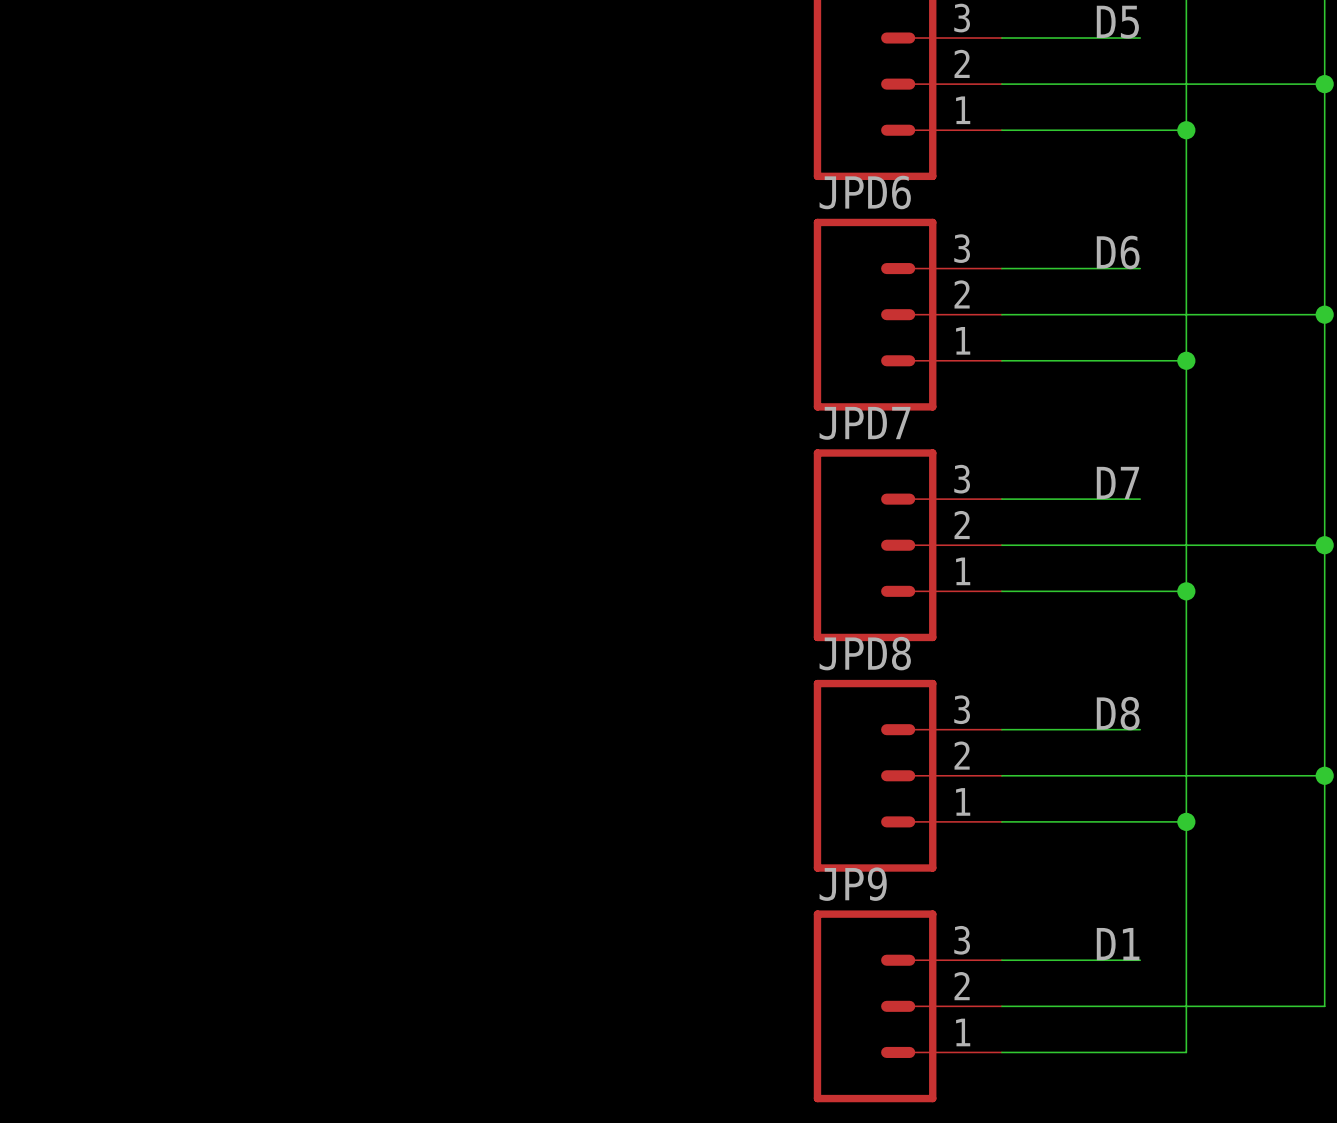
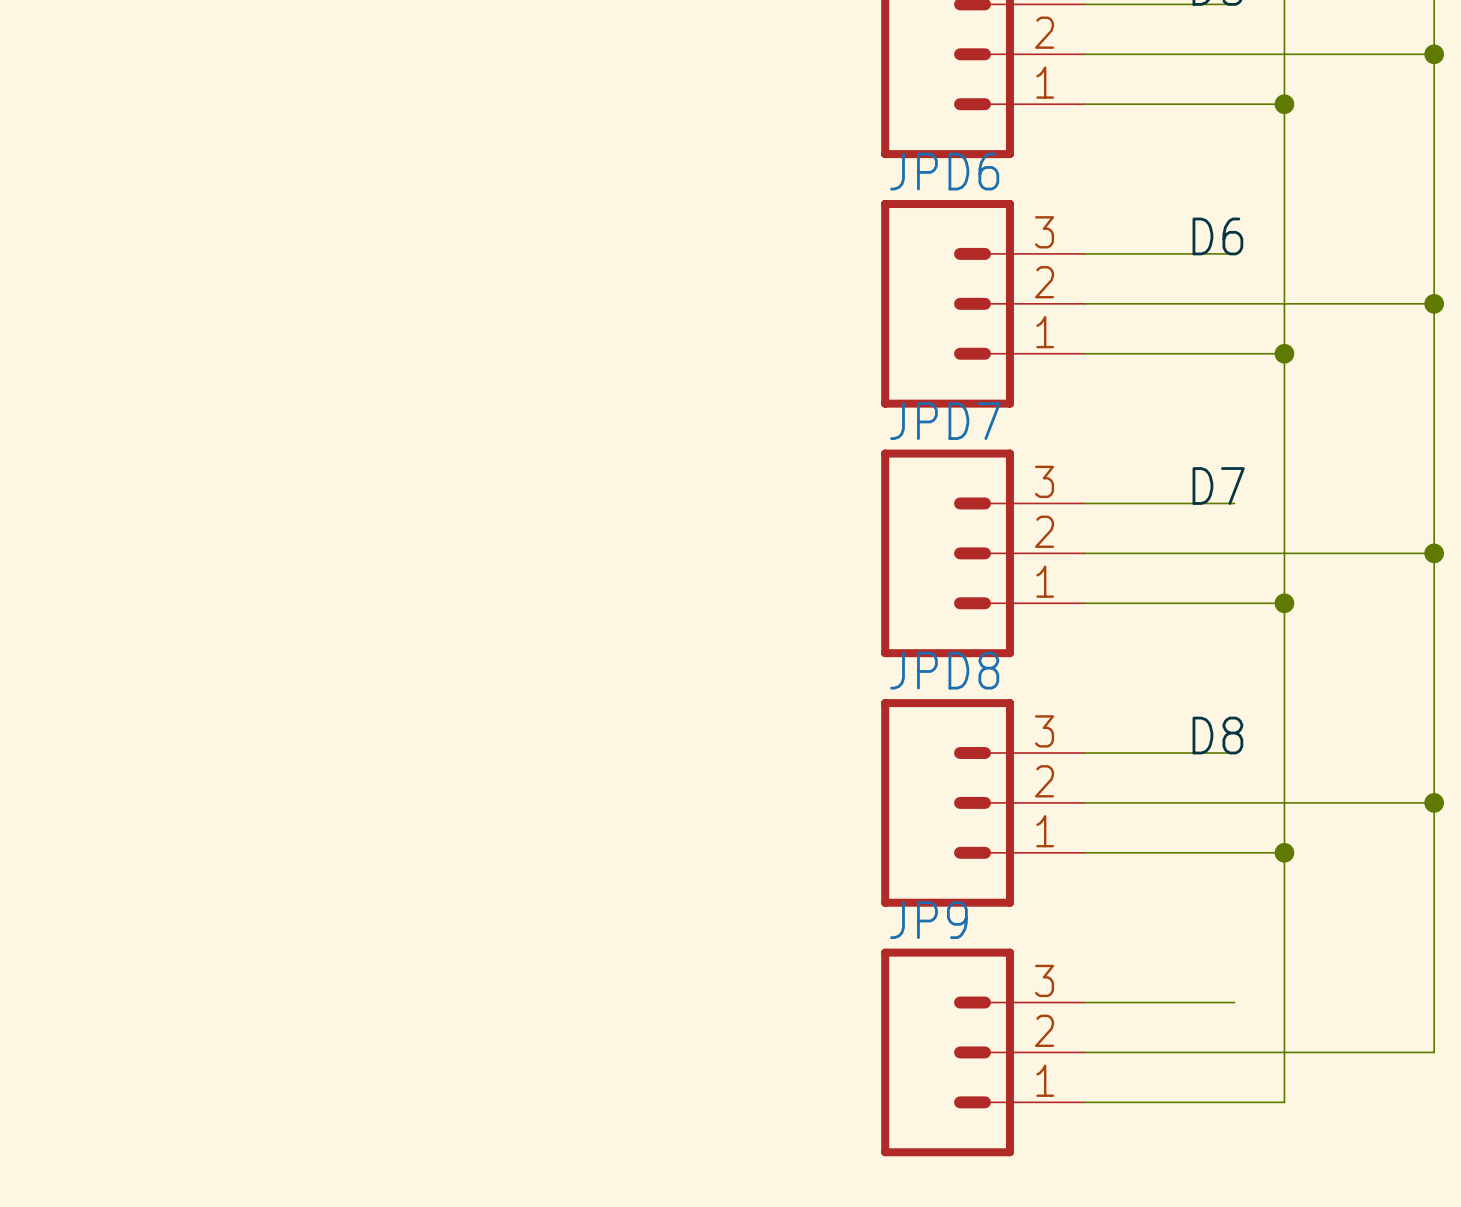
label: D1 (1118, 944) -> none

